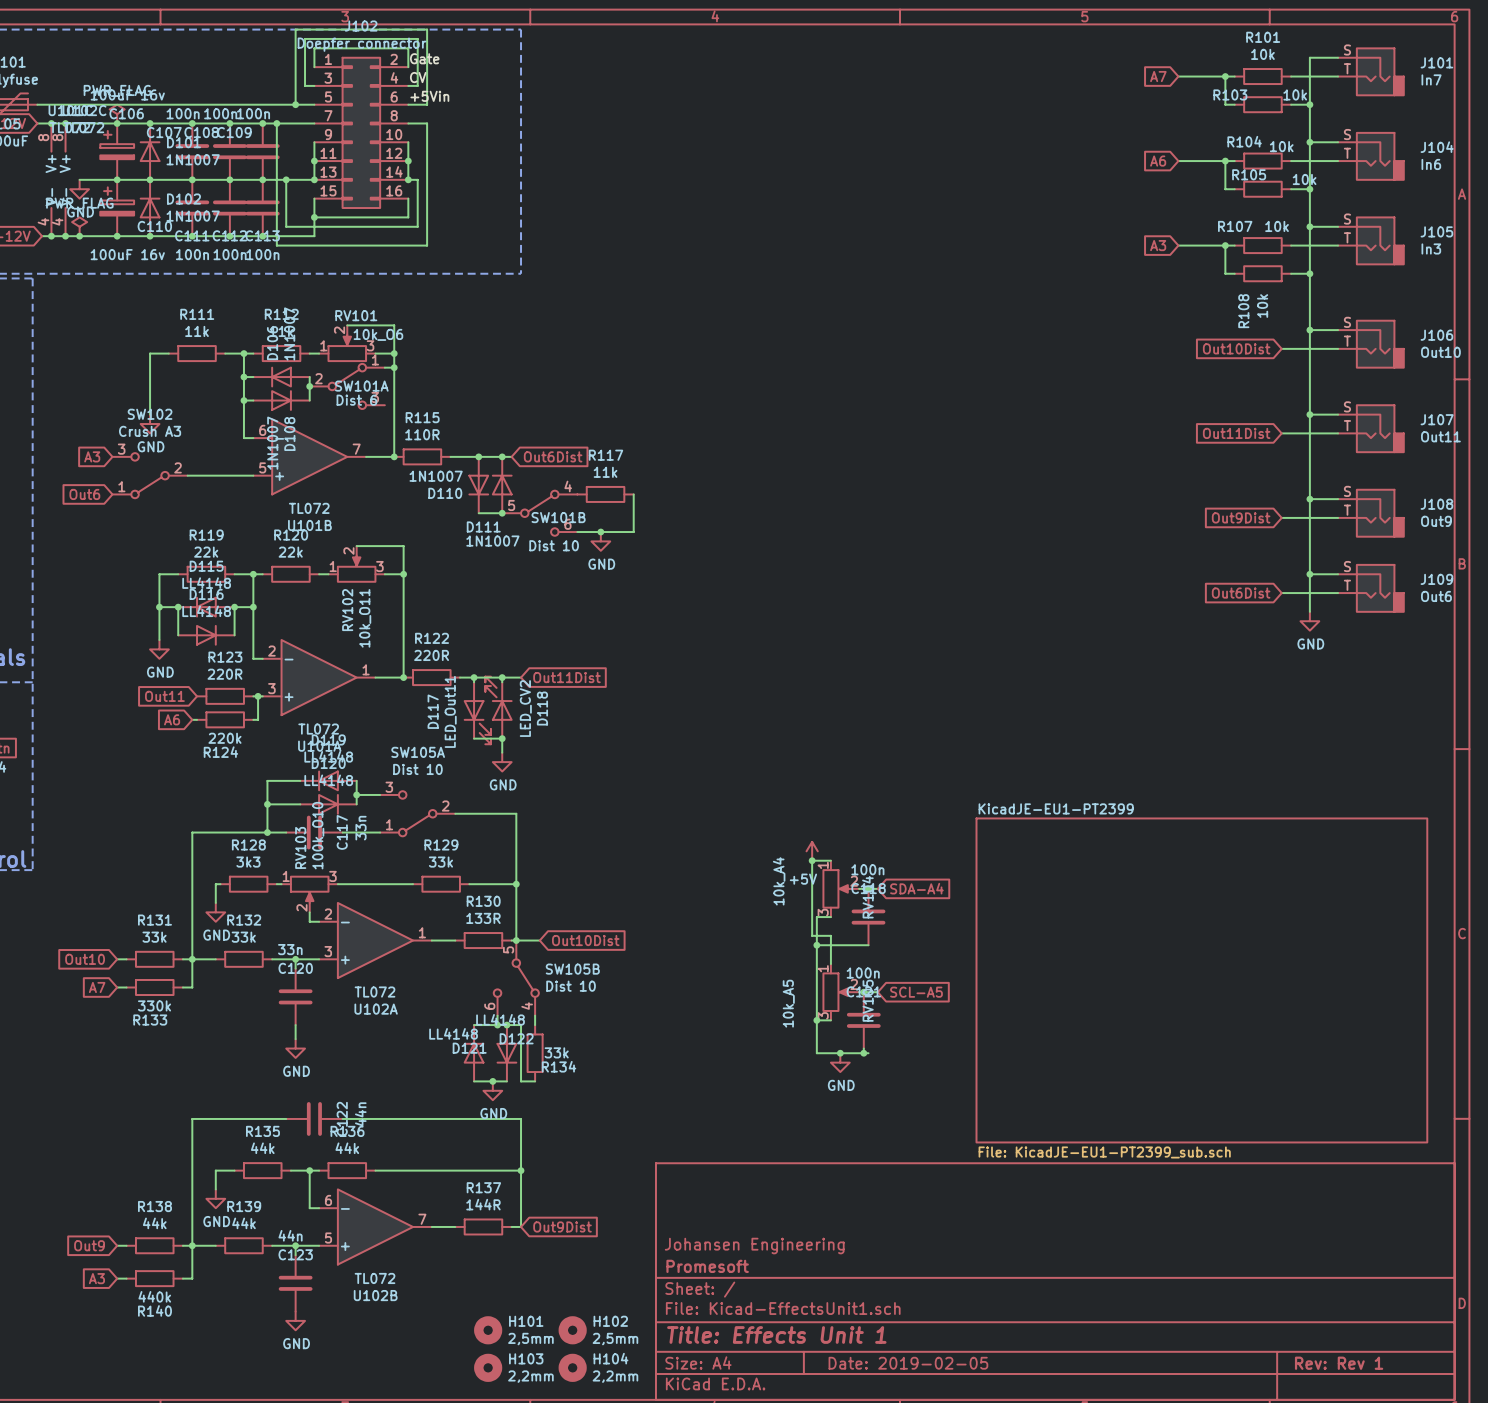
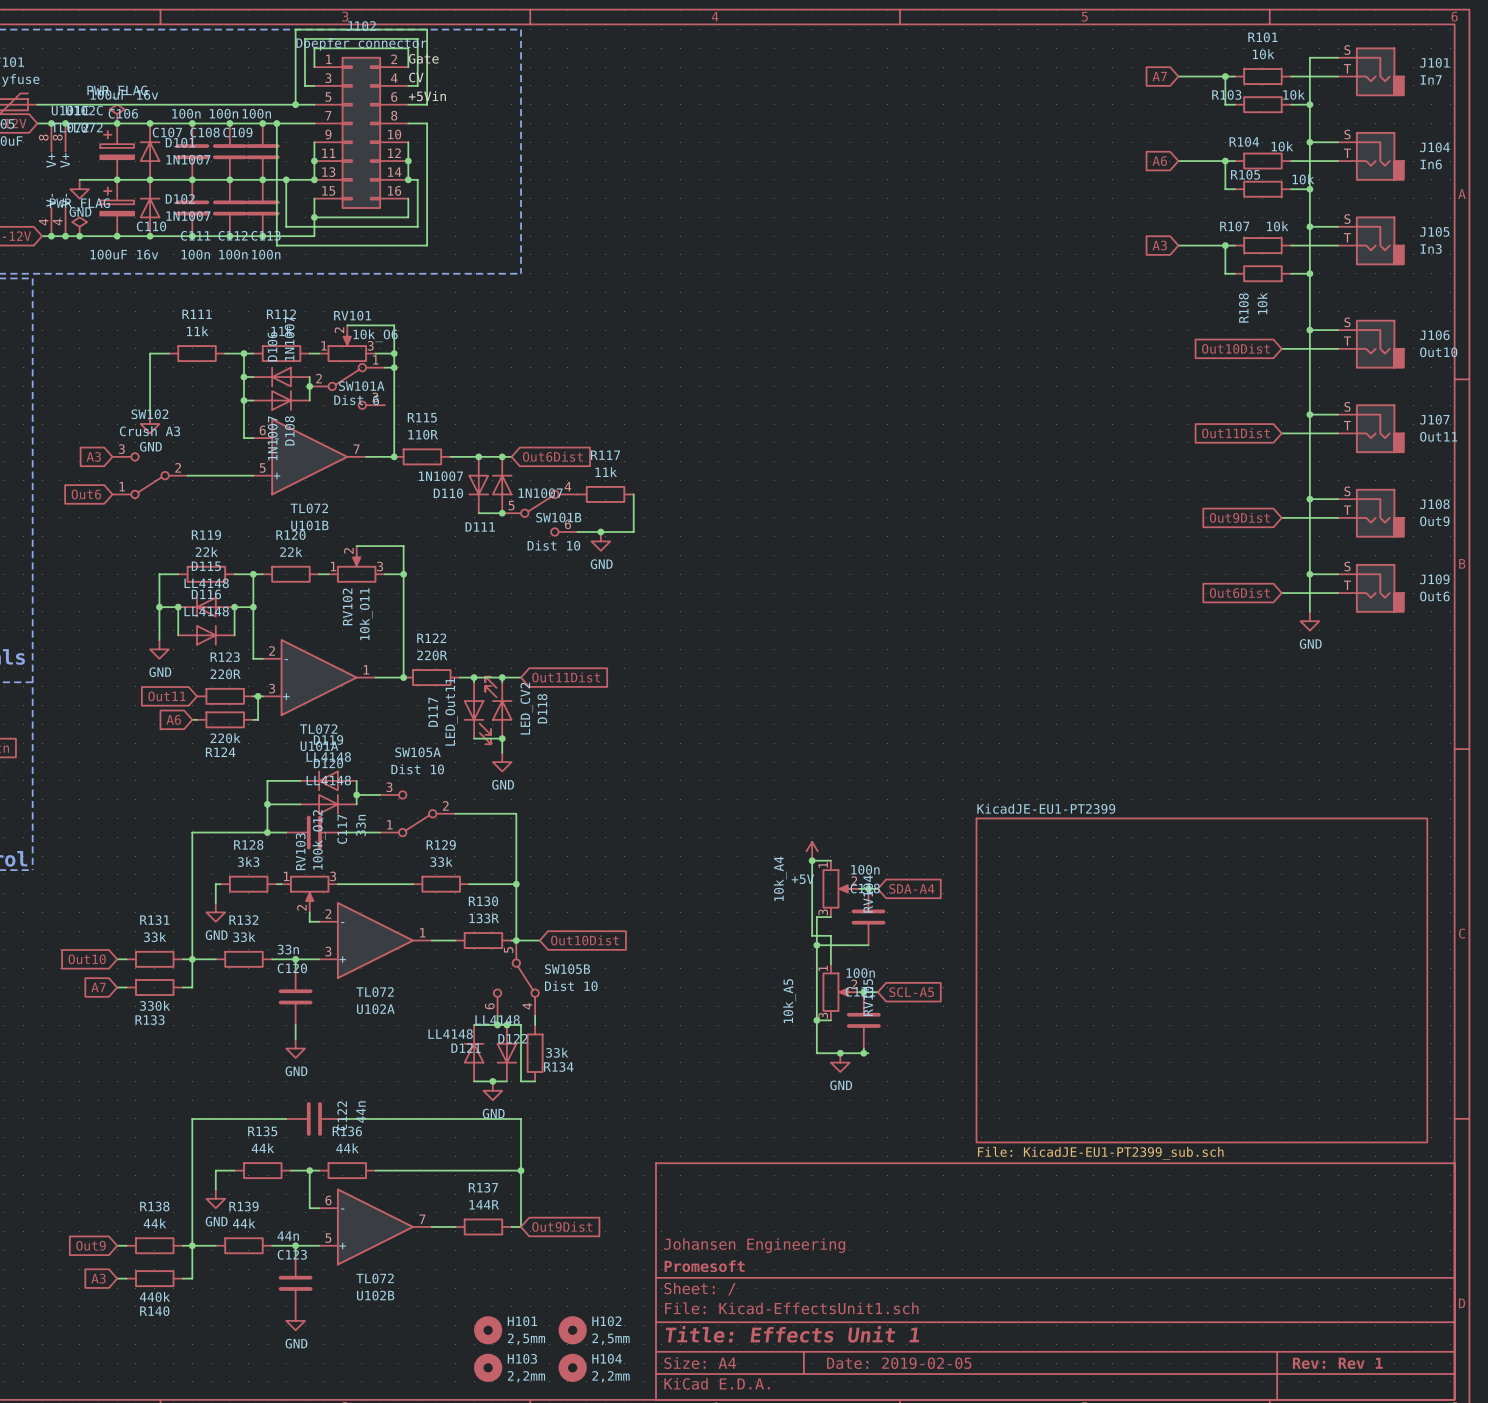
D111 value position: 1N1007 (492, 541) -> 1N1007 (540, 493)
RV103 value: 100k_O10 (318, 835) -> 100k_O12 (319, 839)

